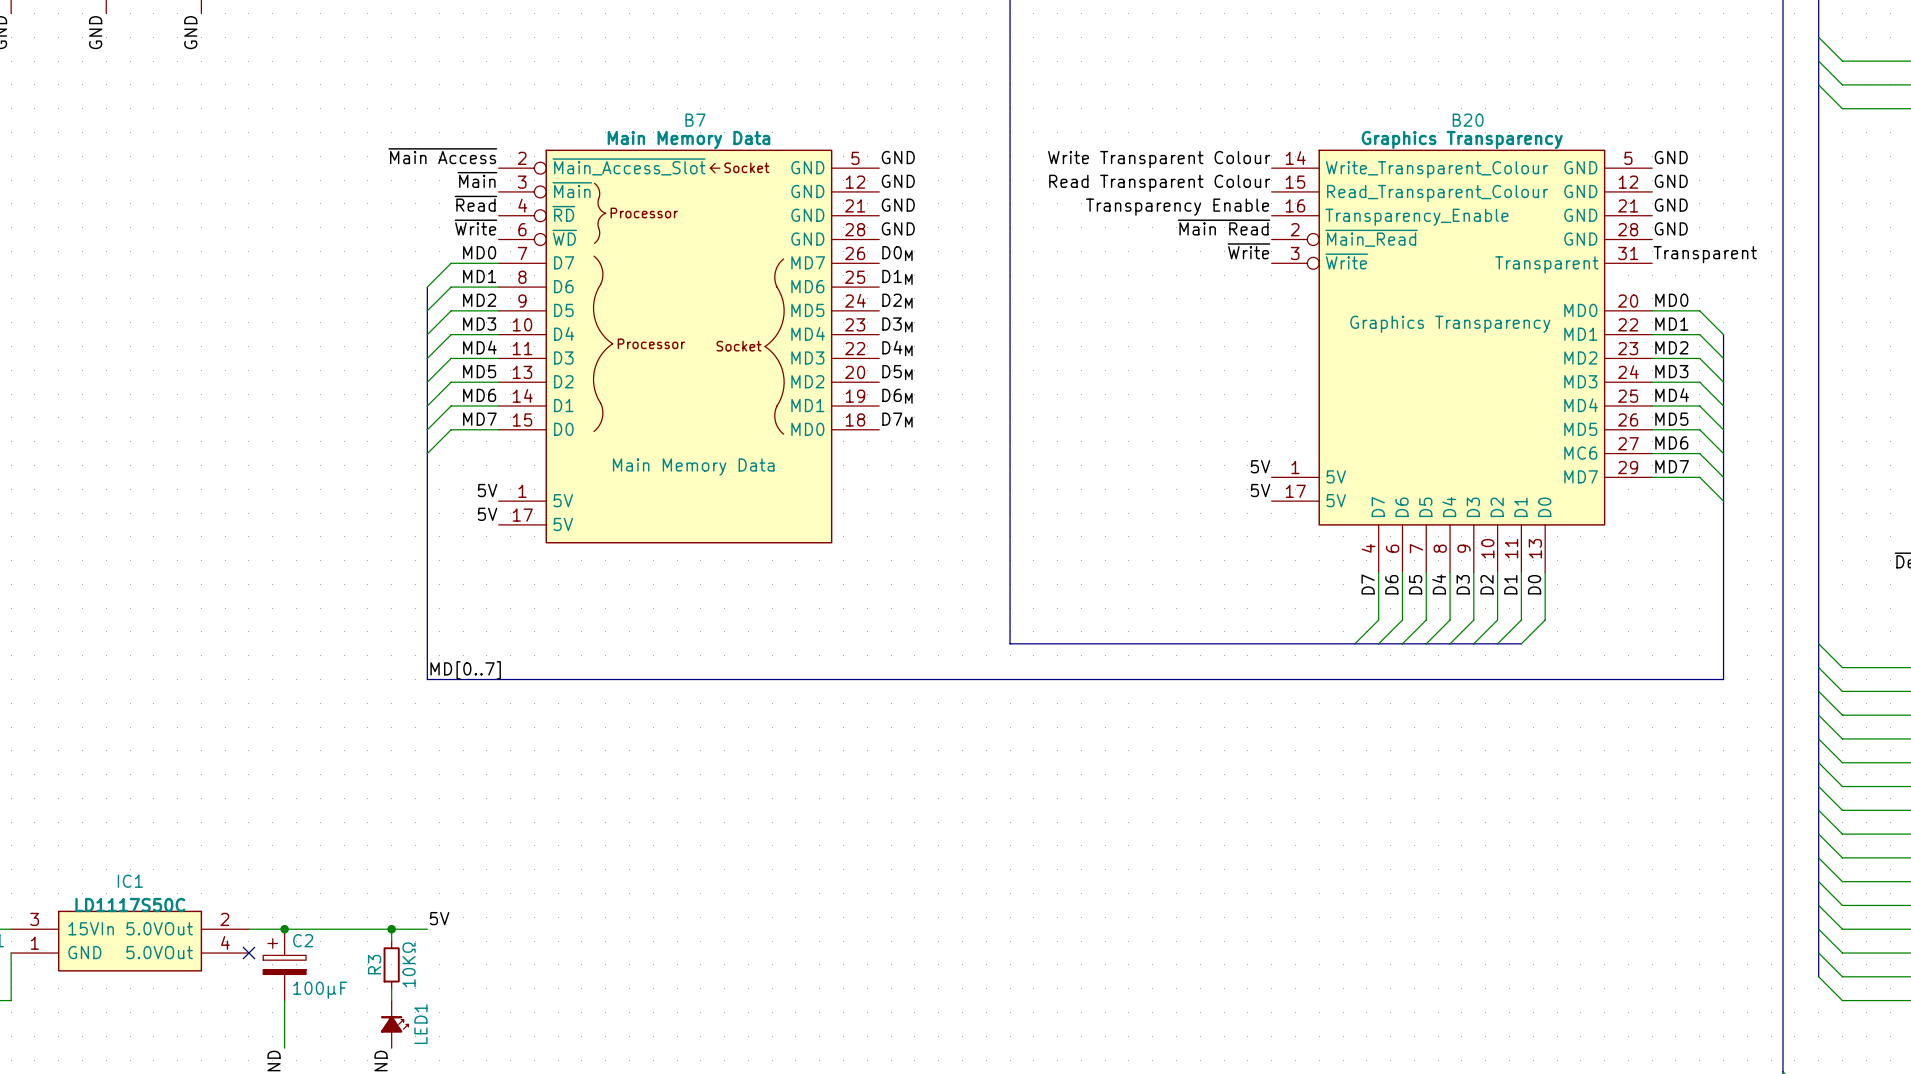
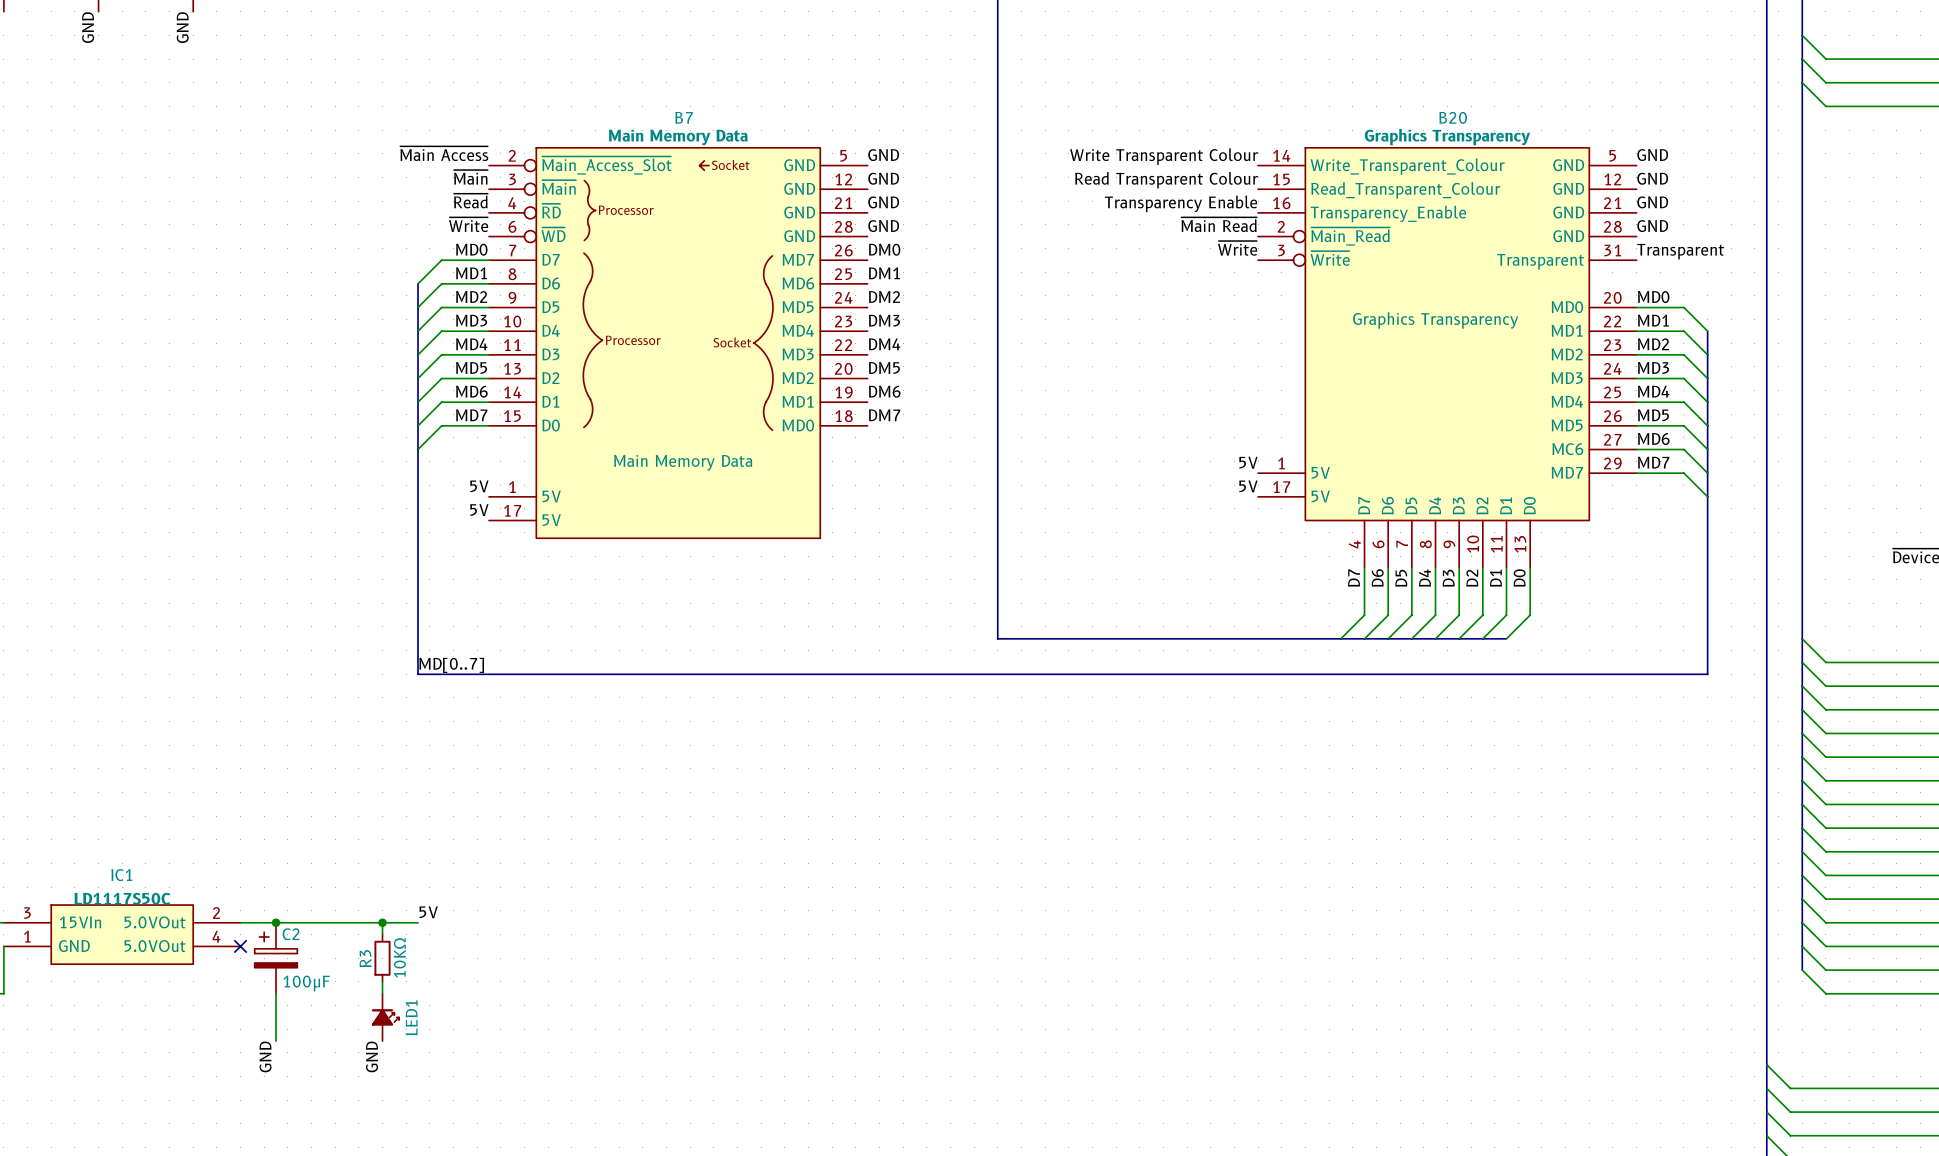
label: D0M (897, 253) -> DM0 (884, 249)
label: D1M (897, 277) -> DM1 (884, 273)
label: D2M (897, 301) -> DM2 (884, 296)
label: D3M (897, 324) -> DM3 (884, 320)
label: D4M (897, 348) -> DM4 (884, 344)
label: D5M (897, 372) -> DM5 (884, 367)
label: D6M (897, 396) -> DM6 (884, 391)
label: D7M (897, 420) -> DM7 (884, 415)

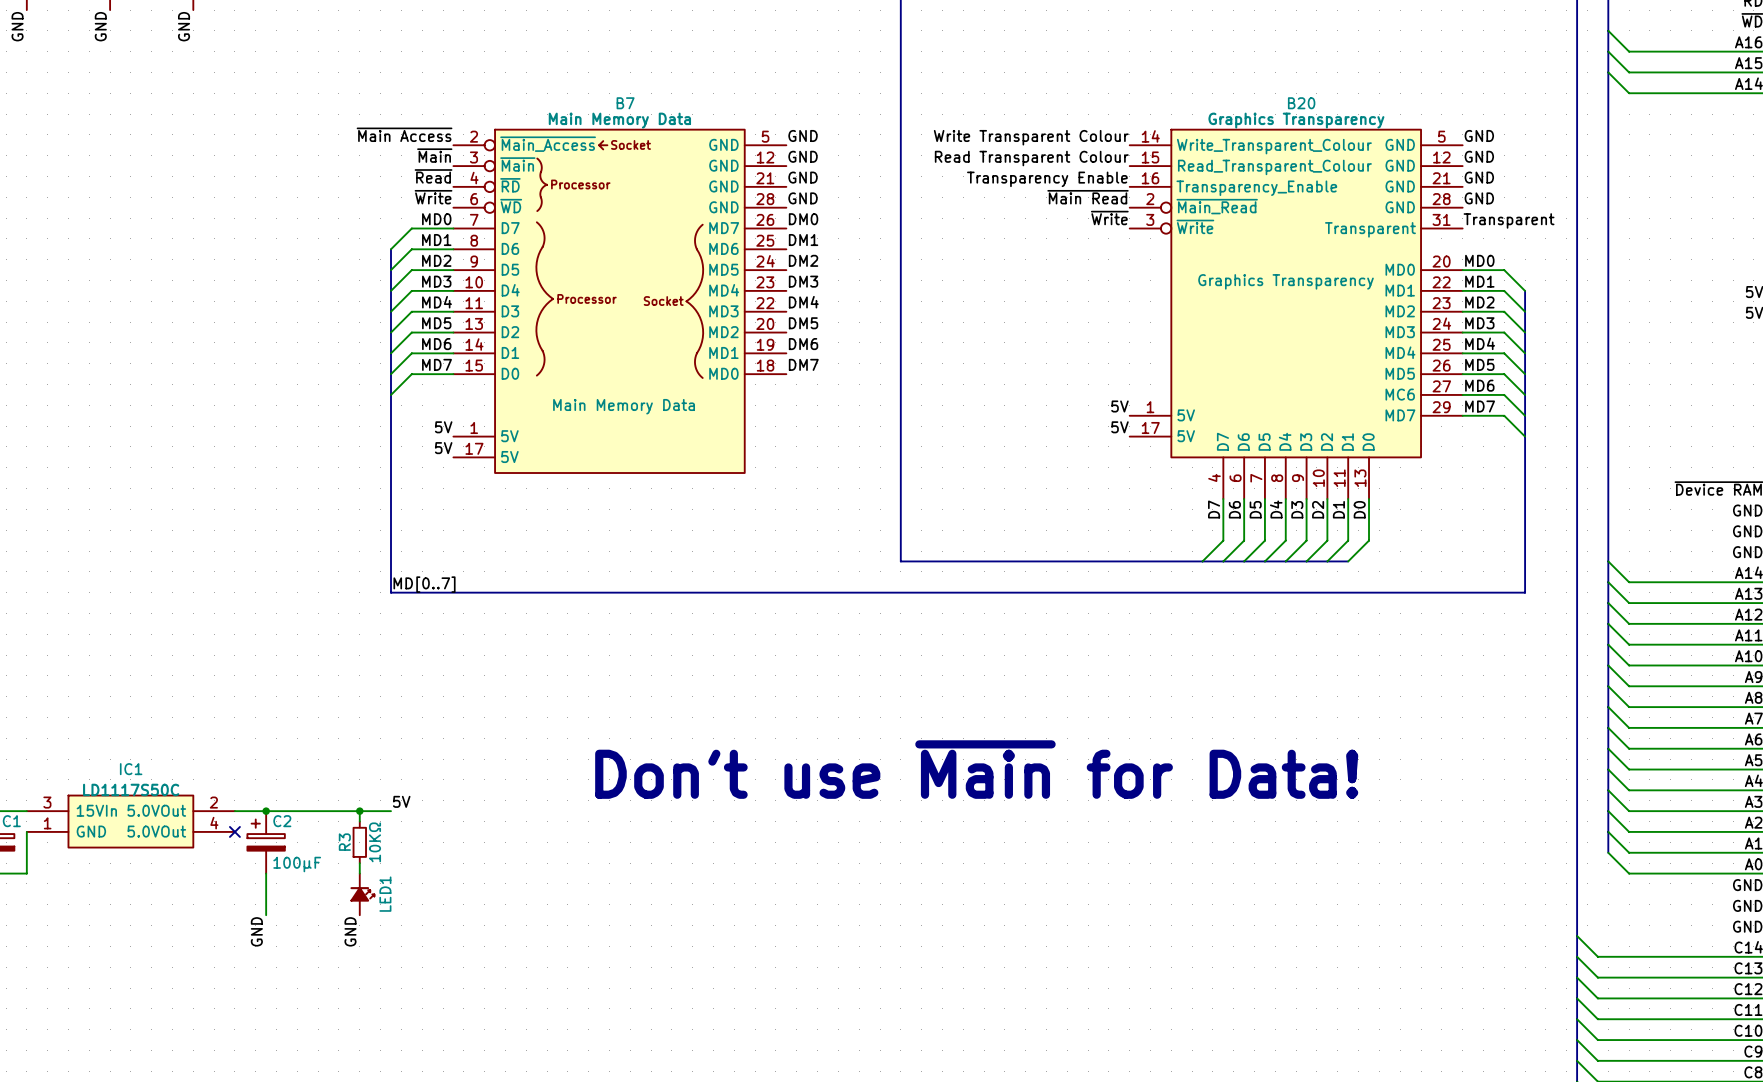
B7 symbol: [488, 147, 868, 539] -> [453, 129, 787, 474]
text: none -> Don't use ~{Main} for Data! (976, 769)

